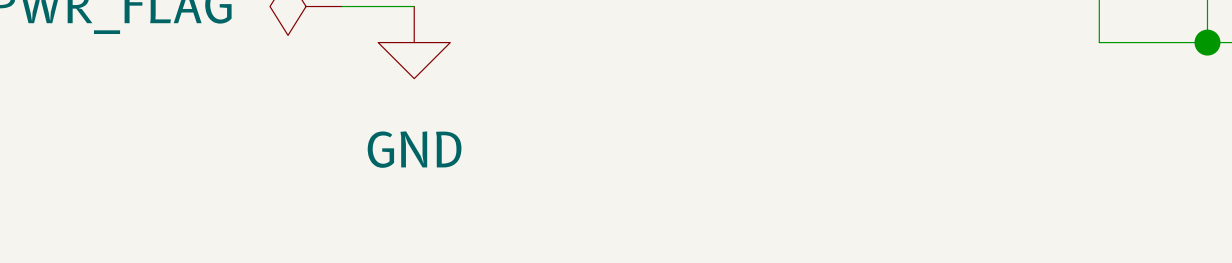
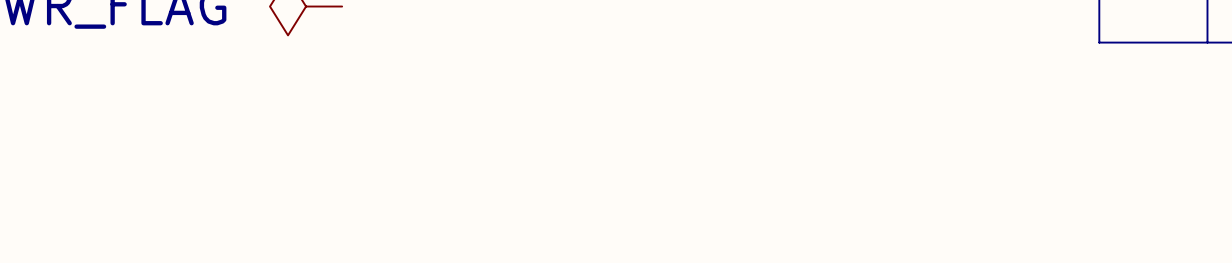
wire: (342, 6) (414, 6) -> none
power symbol: GND (414, 42) -> none
junction: (1207, 42) -> none

